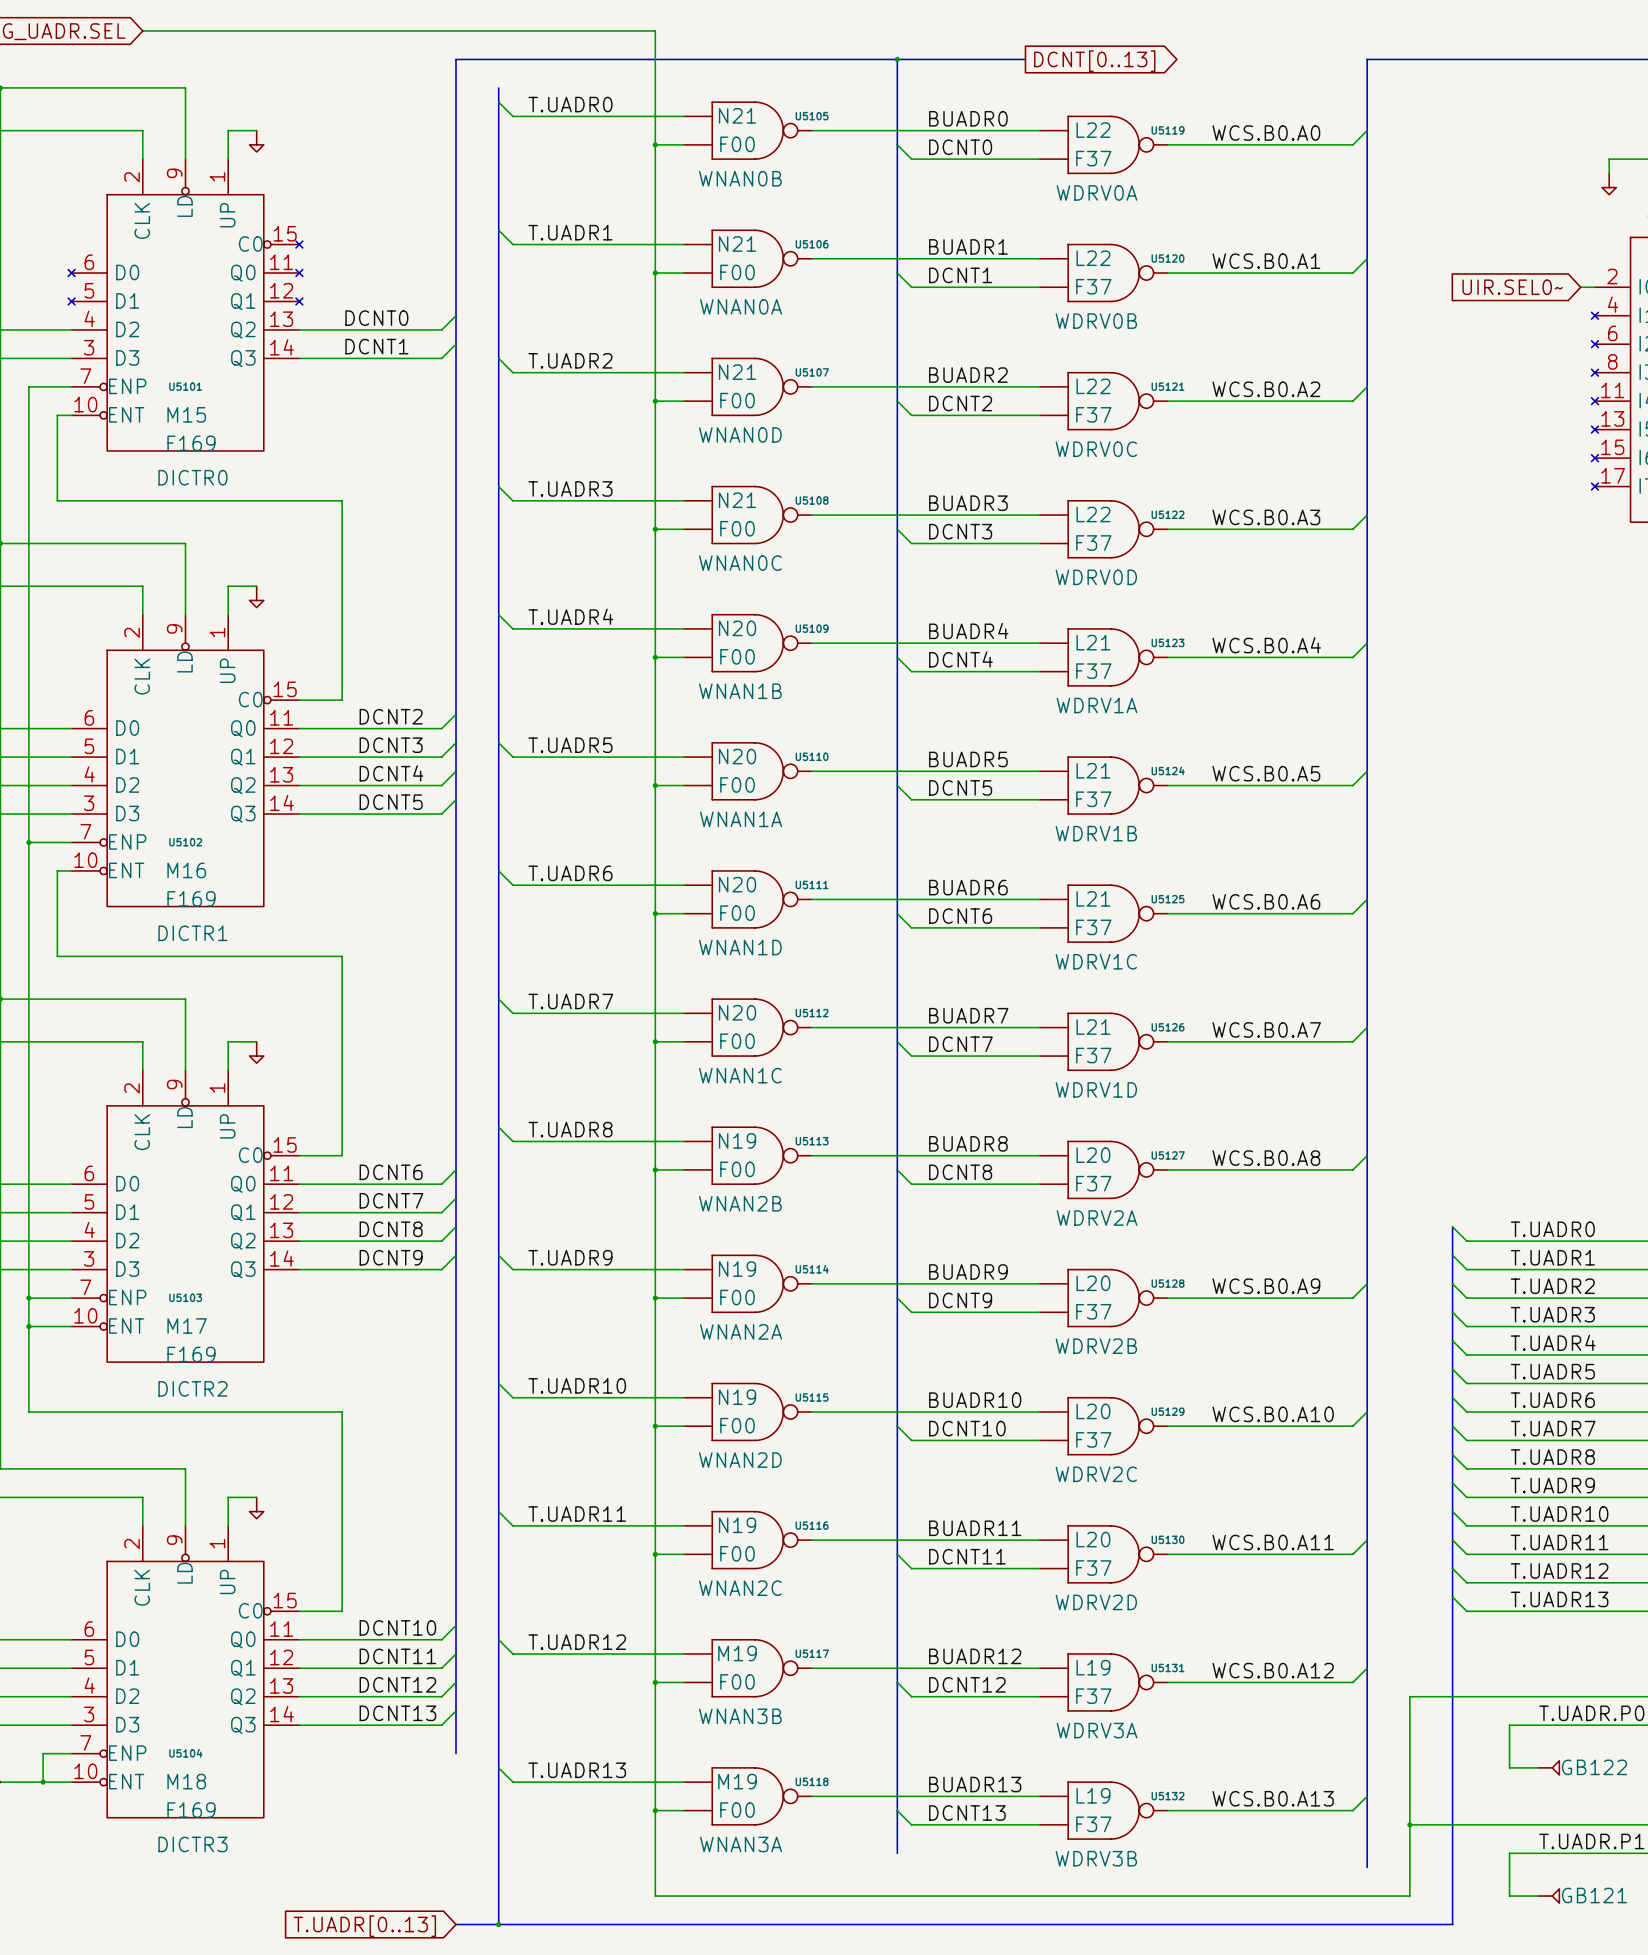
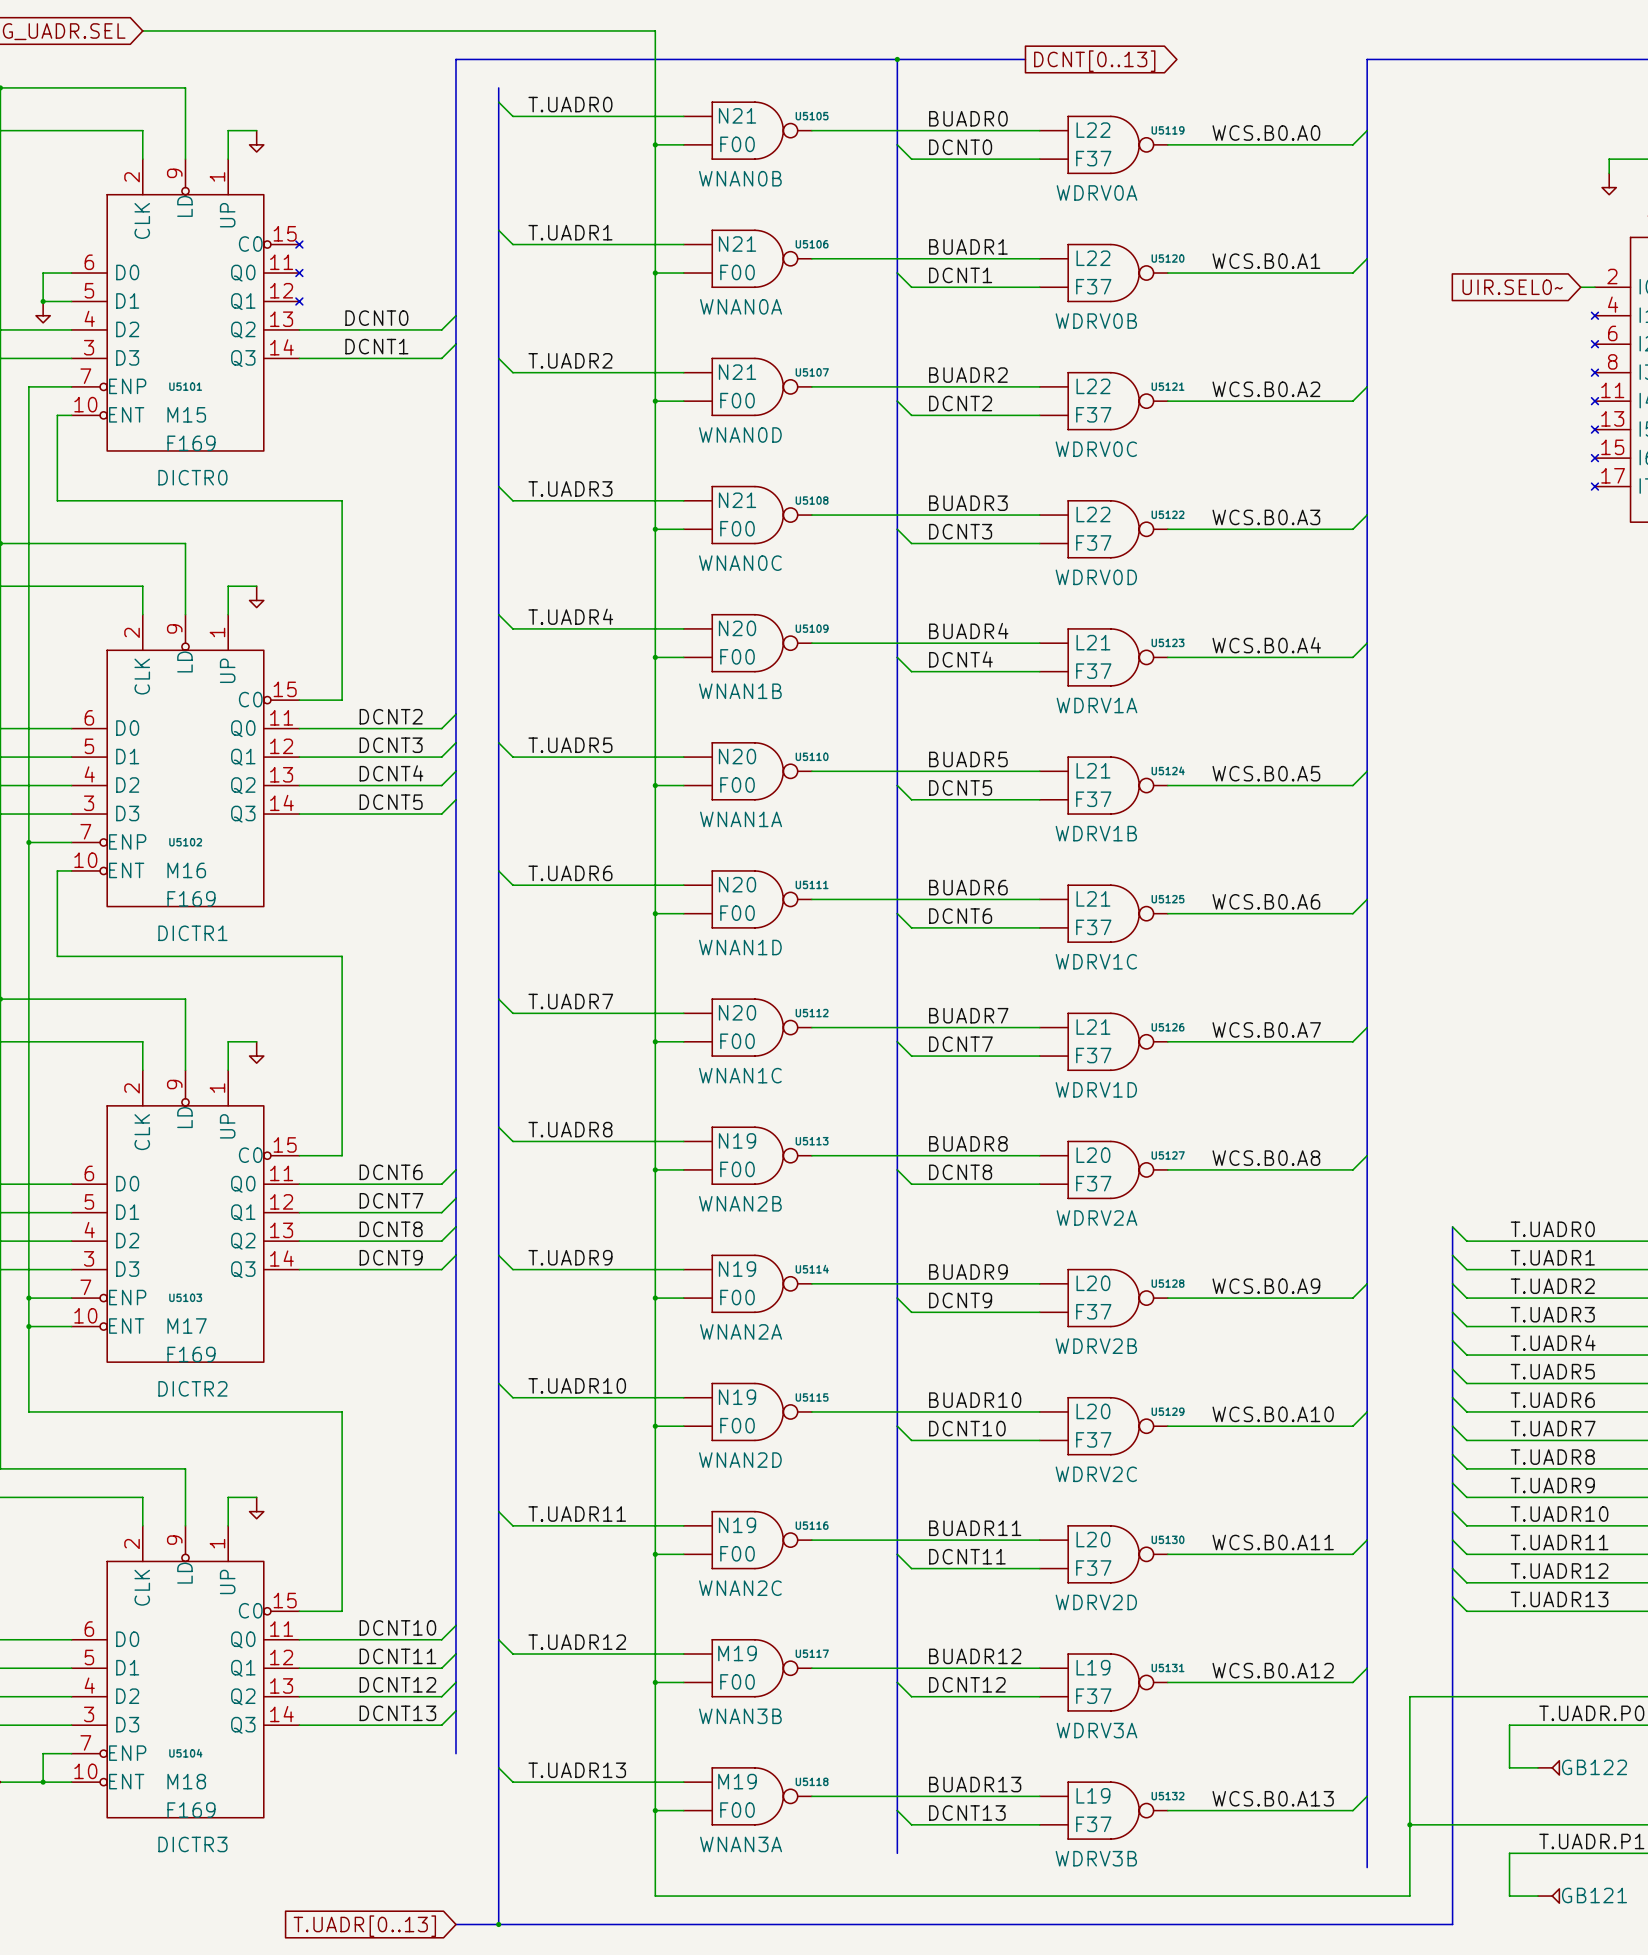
wire: none -> (71, 273) (43, 273) (43, 301) (71, 301)
no-connect mark: (71, 273) -> none
junction: none -> (43, 301)
no-connect mark: (71, 301) -> none
power symbol: none -> (43, 312)

